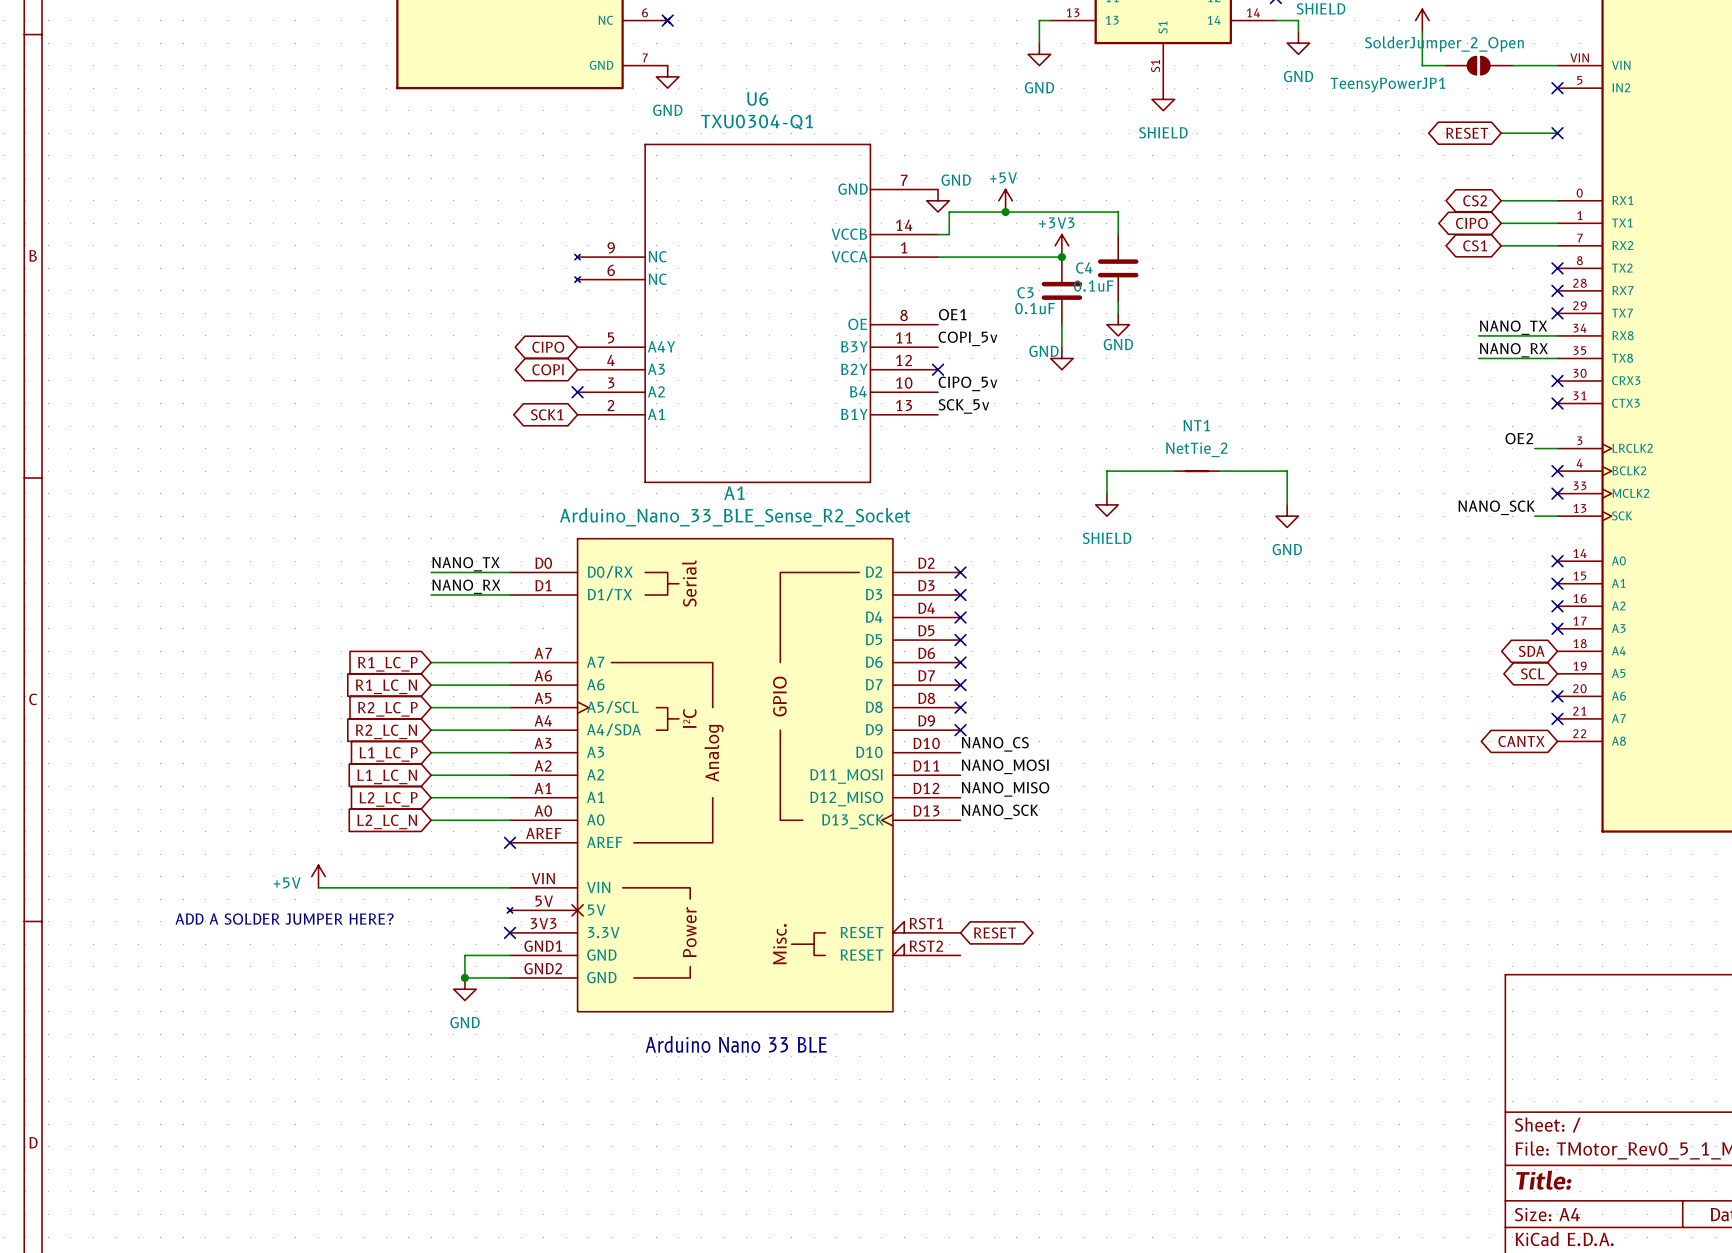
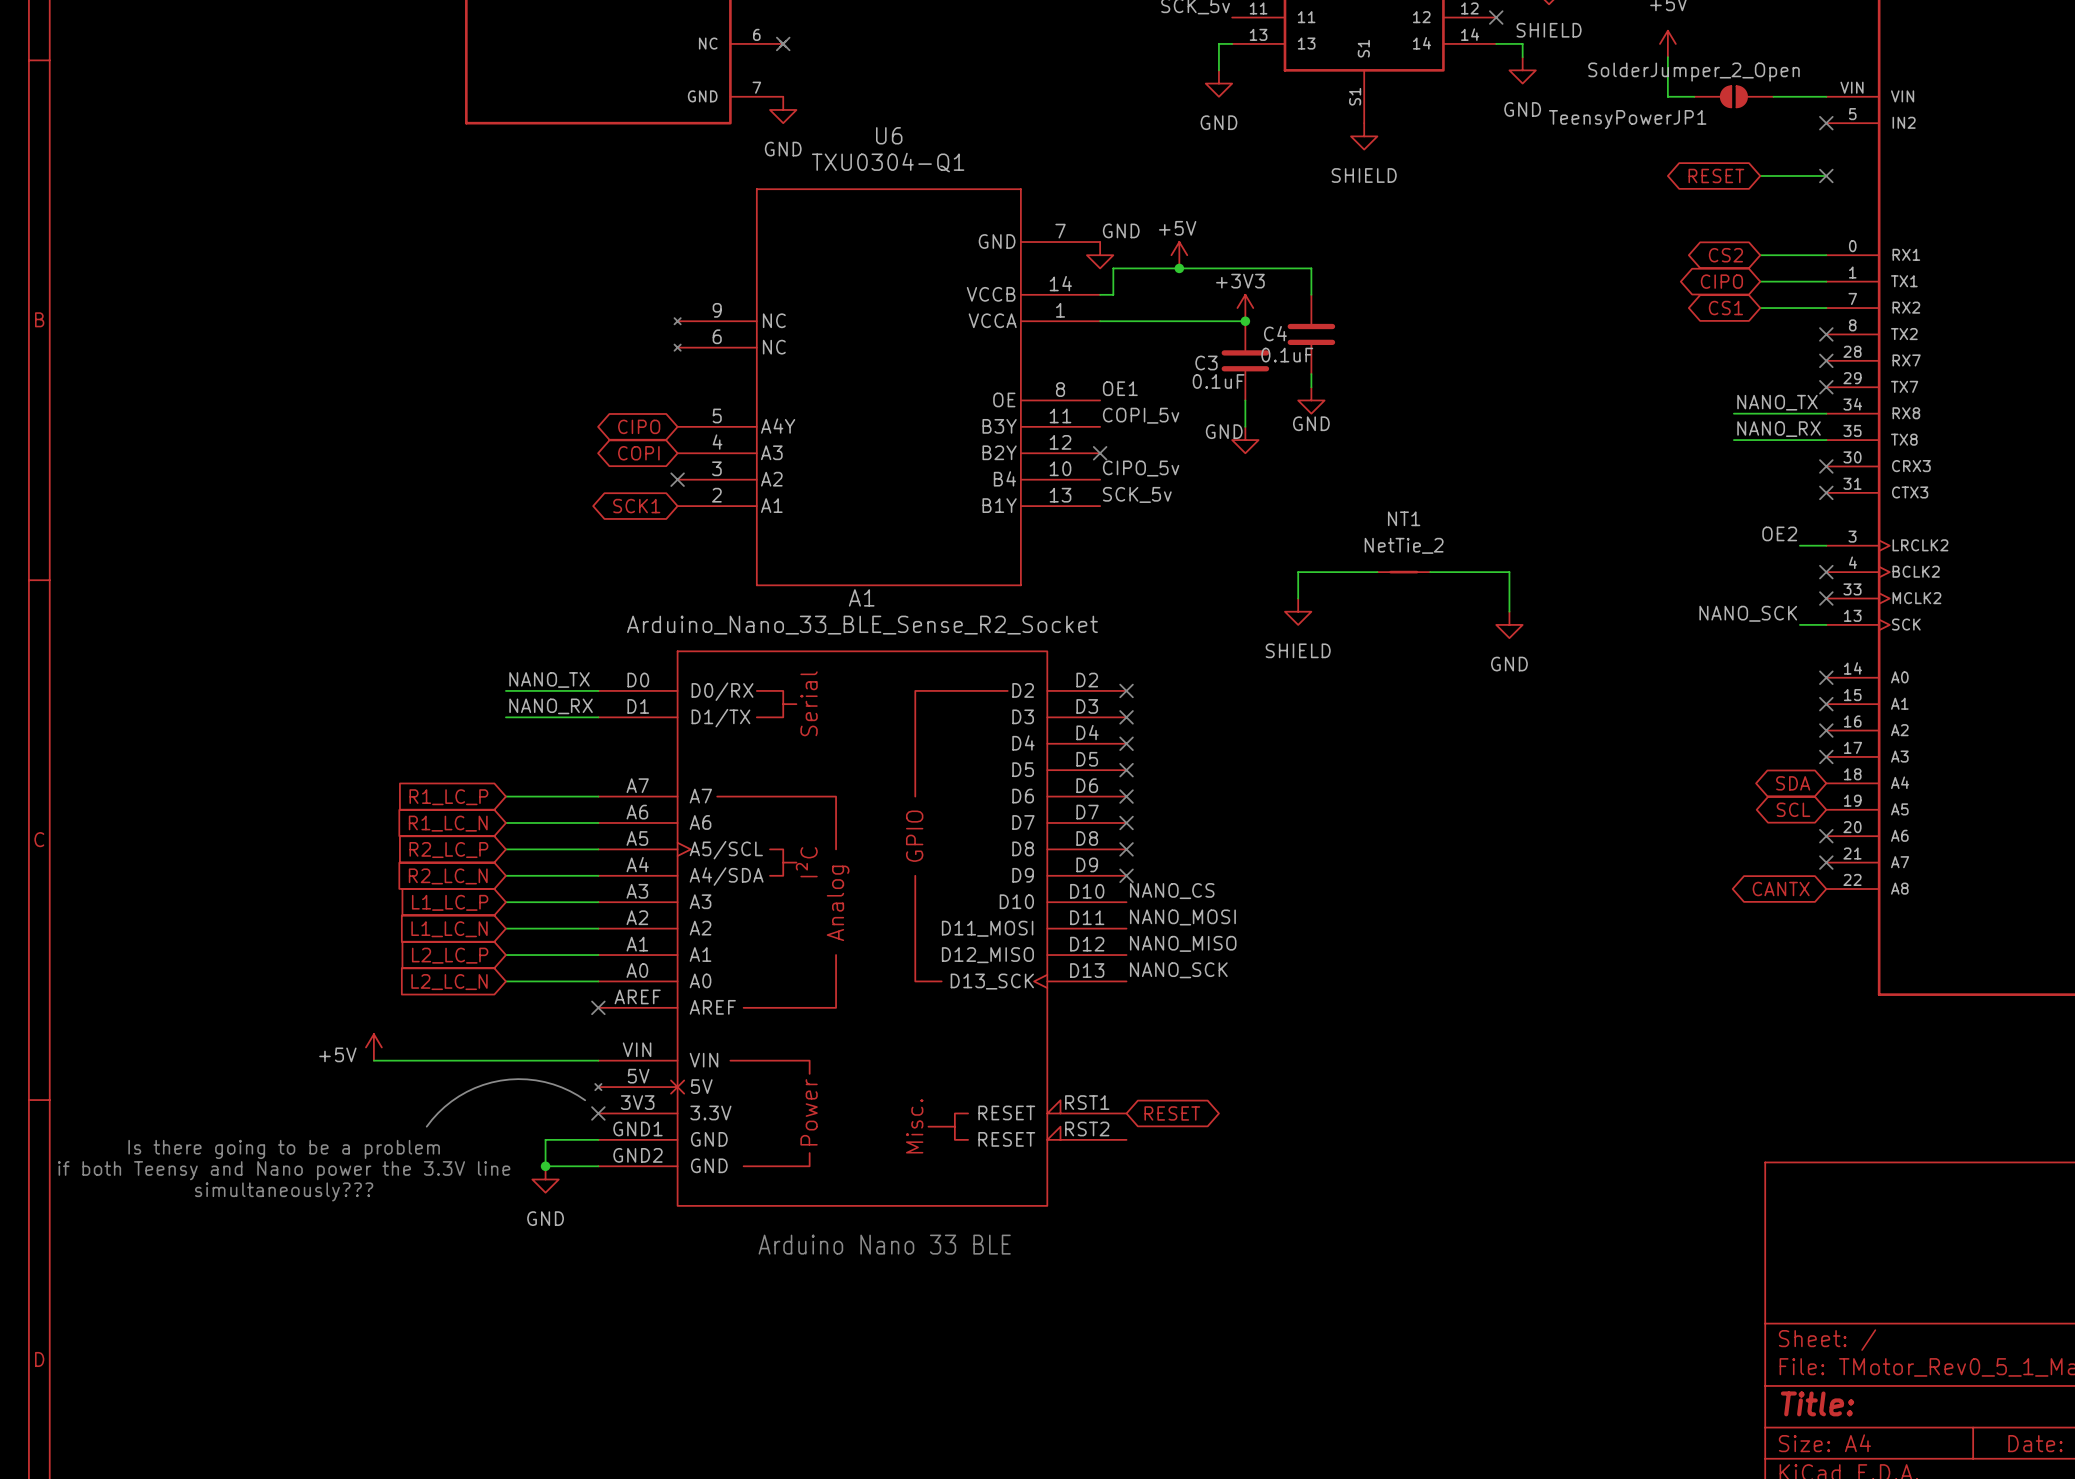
text: ADD A SOLDER JUMPER HERE? (284, 919) -> none
line: none -> (585, 1100) (561, 1087) (544, 1082) (518, 1079) (500, 1080) (474, 1088) (459, 1096) (444, 1106) (426, 1126)
text: none -> Is there going to be a problem (284, 1149)
text: none -> if both Teensy and Nano power the 3.3V line (284, 1170)
text: none -> simultaneously??? (284, 1191)

